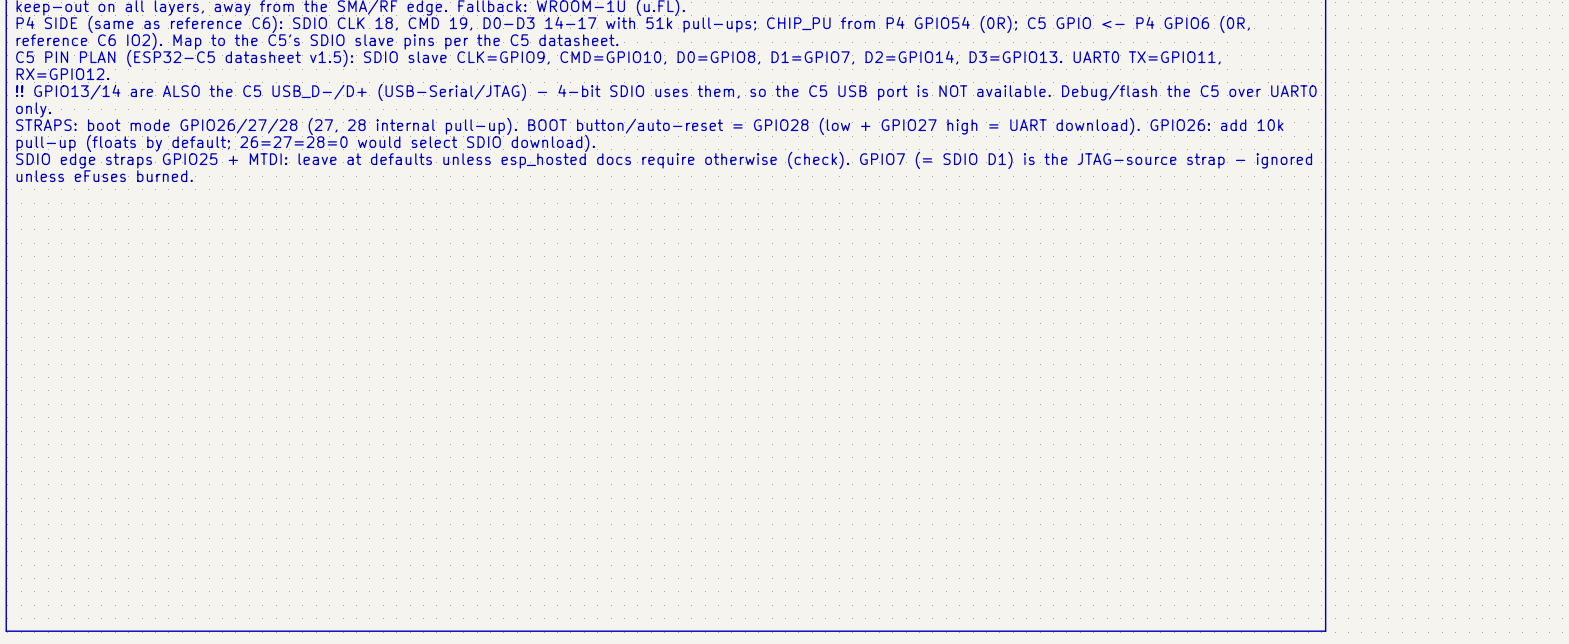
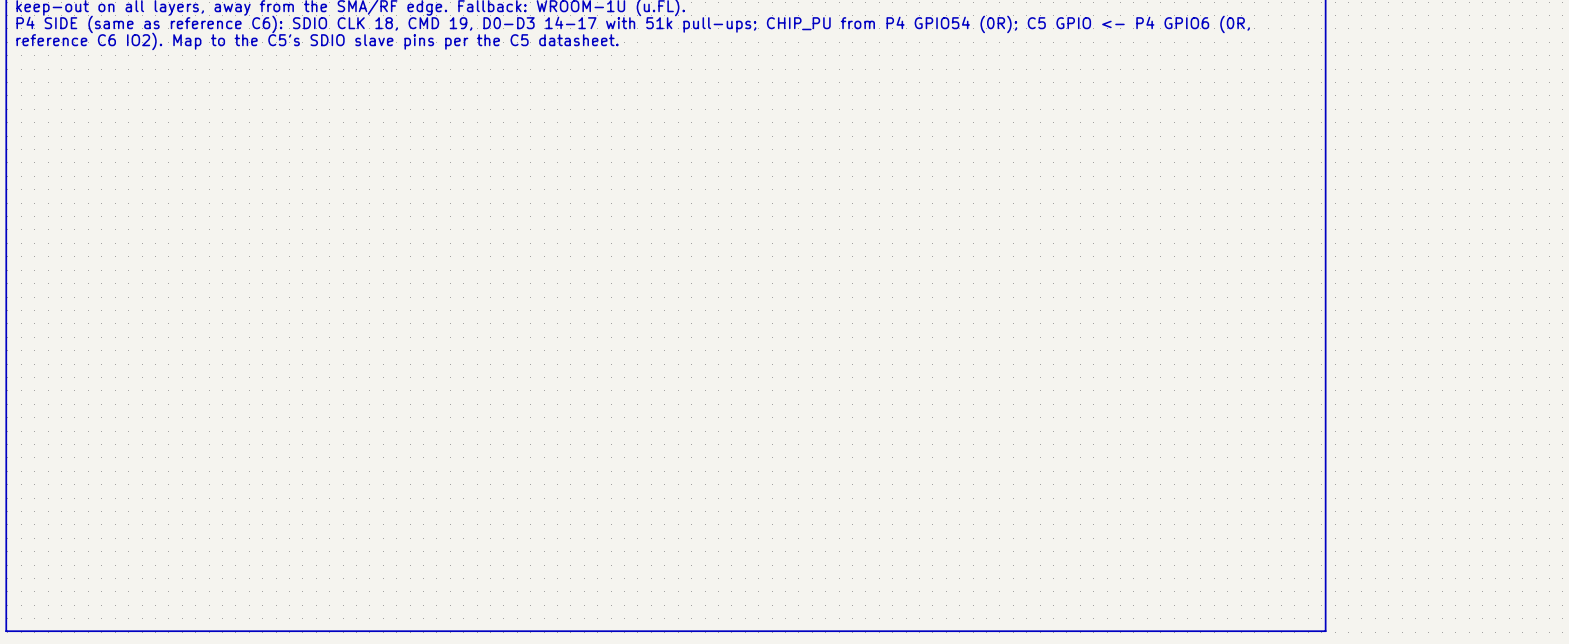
text: C5 PIN PLAN (ESP32-C5 datasheet v1.5): SDIO slave CLK=GPIO9, CMD=GPIO10, D0=GPIO8, D1=GPIO7, D2=GPIO14, D3=GPIO13. UART0 TX=GPIO11, (618, 58) -> none
text: RX=GPIO12. (62, 74) -> none
text: !! GPIO13/14 are ALSO the C5 USB_D-/D+ (USB-Serial/JTAG) - 4-bit SDIO uses them, so the C5 USB port is NOT available. Debug/flash the C5 over UART0 (666, 92) -> none
text: only. (33, 109) -> none
text: STRAPS: boot mode GPIO26/27/28 (27, 28 internal pull-up). BOOT button/auto-reset = GPIO28 (low + GPIO27 high = UART download). GPIO26: add 10k (649, 126) -> none
text: pull-up (floats by default; 26=27=28=0 would select SDIO download). (305, 143) -> none
text: SDIO edge straps GPIO25 + MTDI: leave at defaults unless esp_hosted docs require otherwise (check). GPIO7 (= SDIO D1) is the JTAG-source strap - ignored (664, 160) -> none
text: unless eFuses burned. (104, 176) -> none

